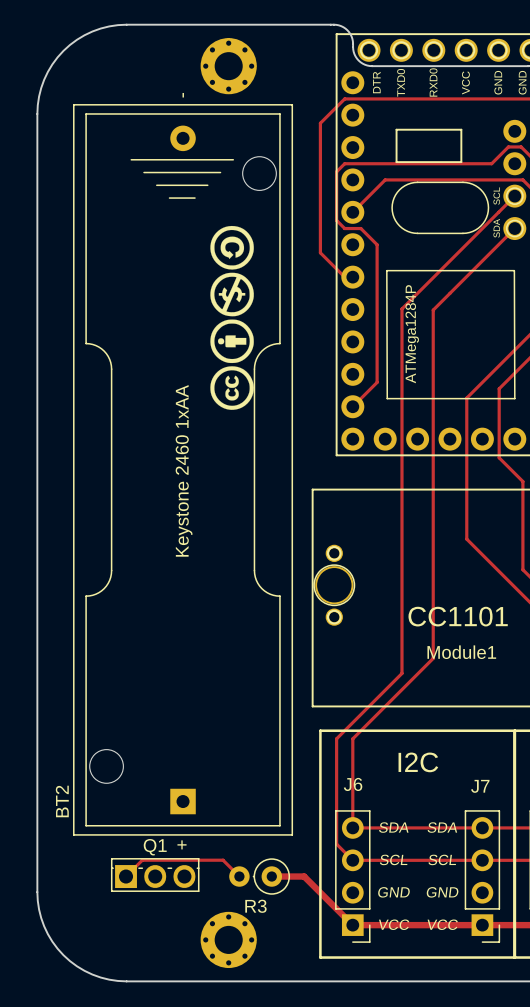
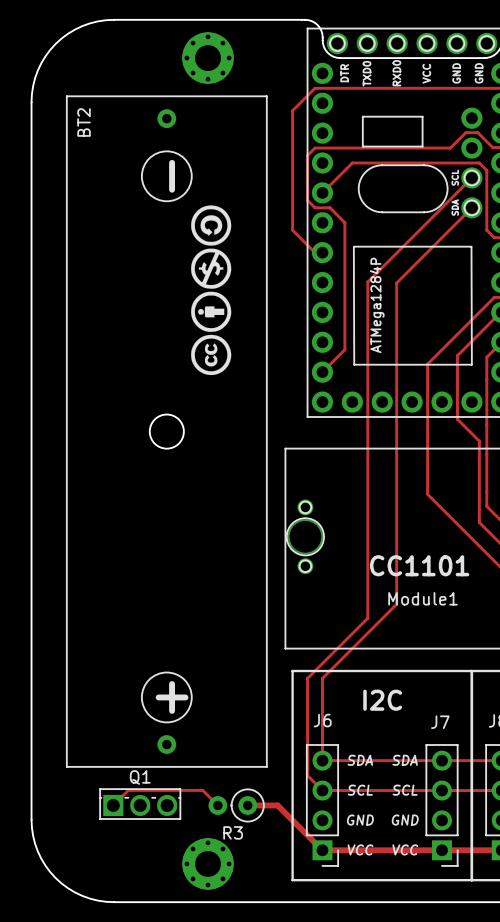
BT2 footprint: [73, 104, 294, 836] -> [65, 95, 268, 768]
BT2 name position: BT2 (62, 801) -> BT2 (84, 122)

